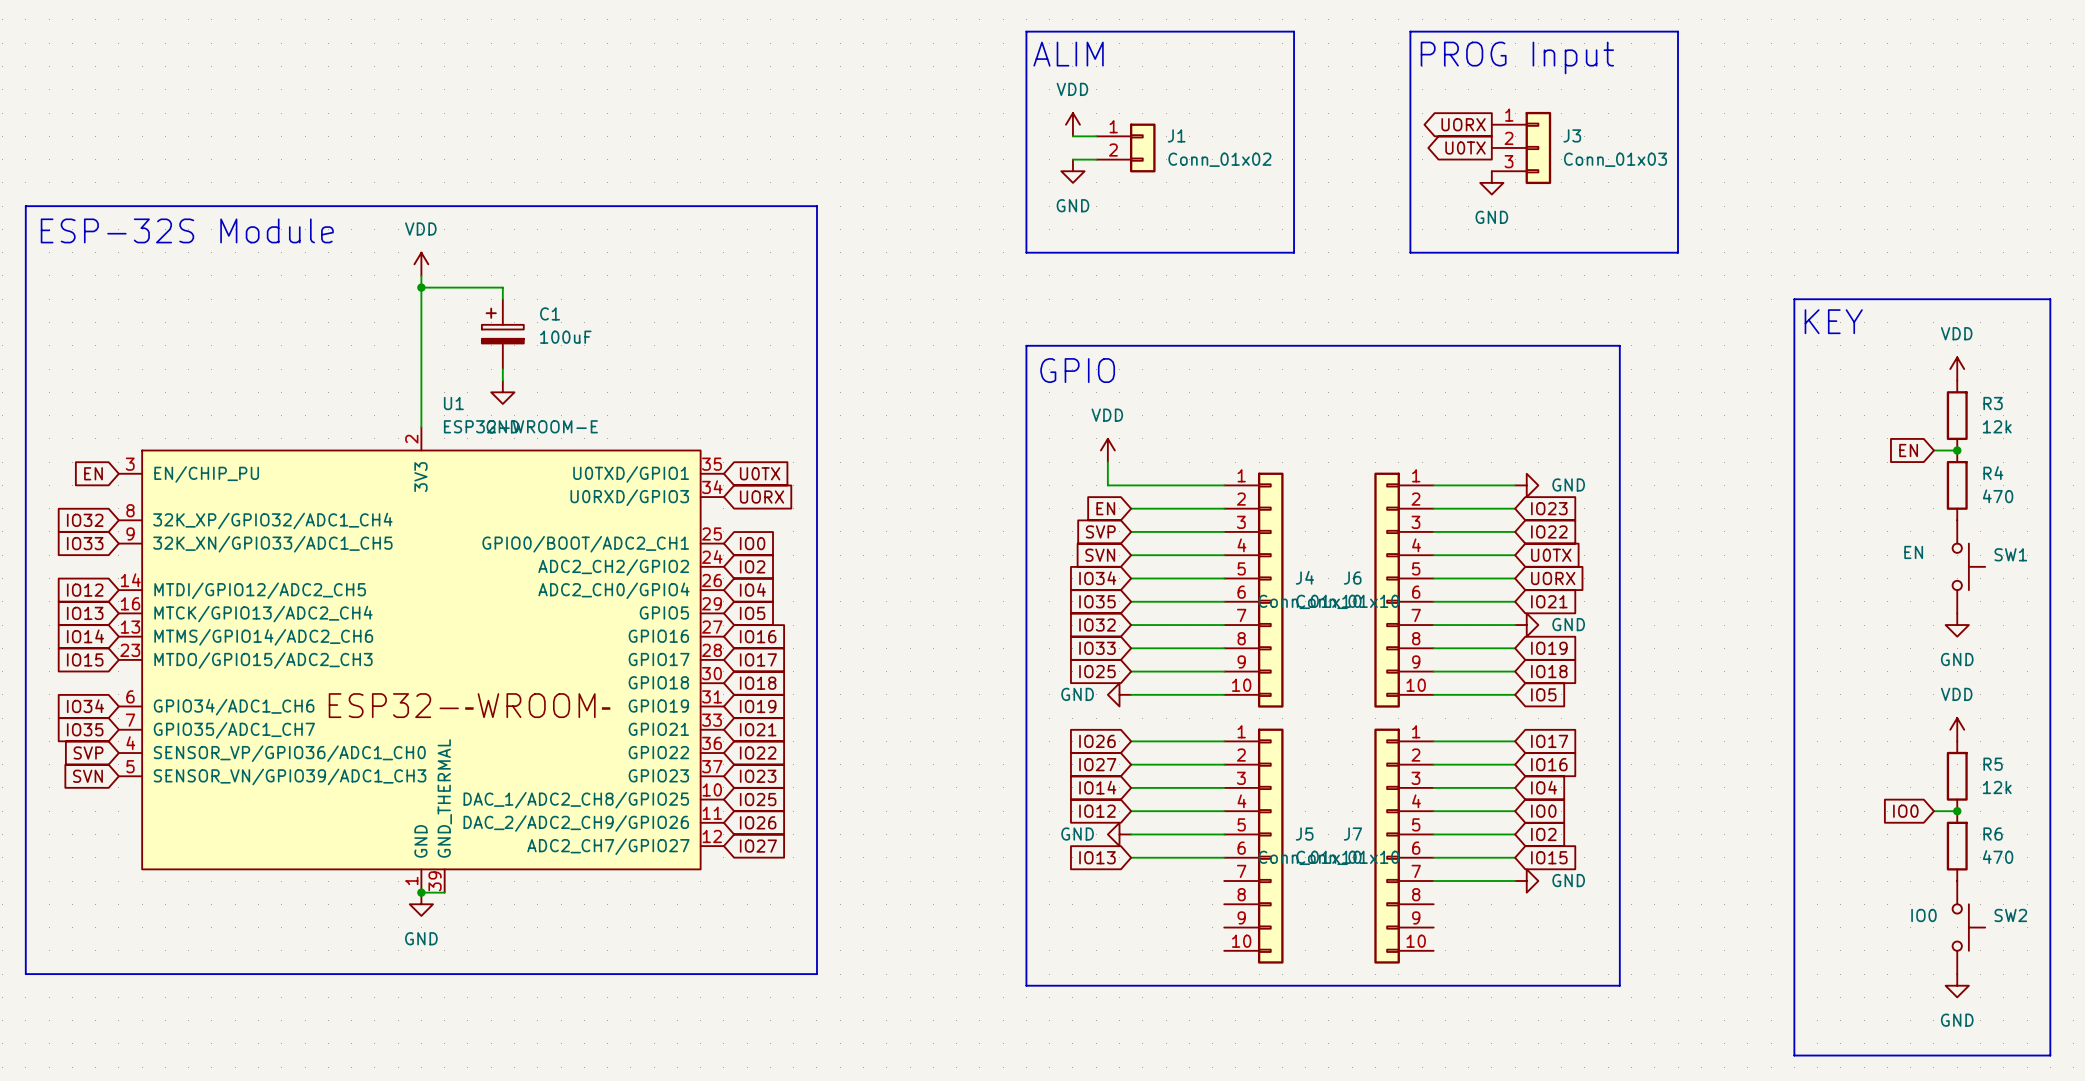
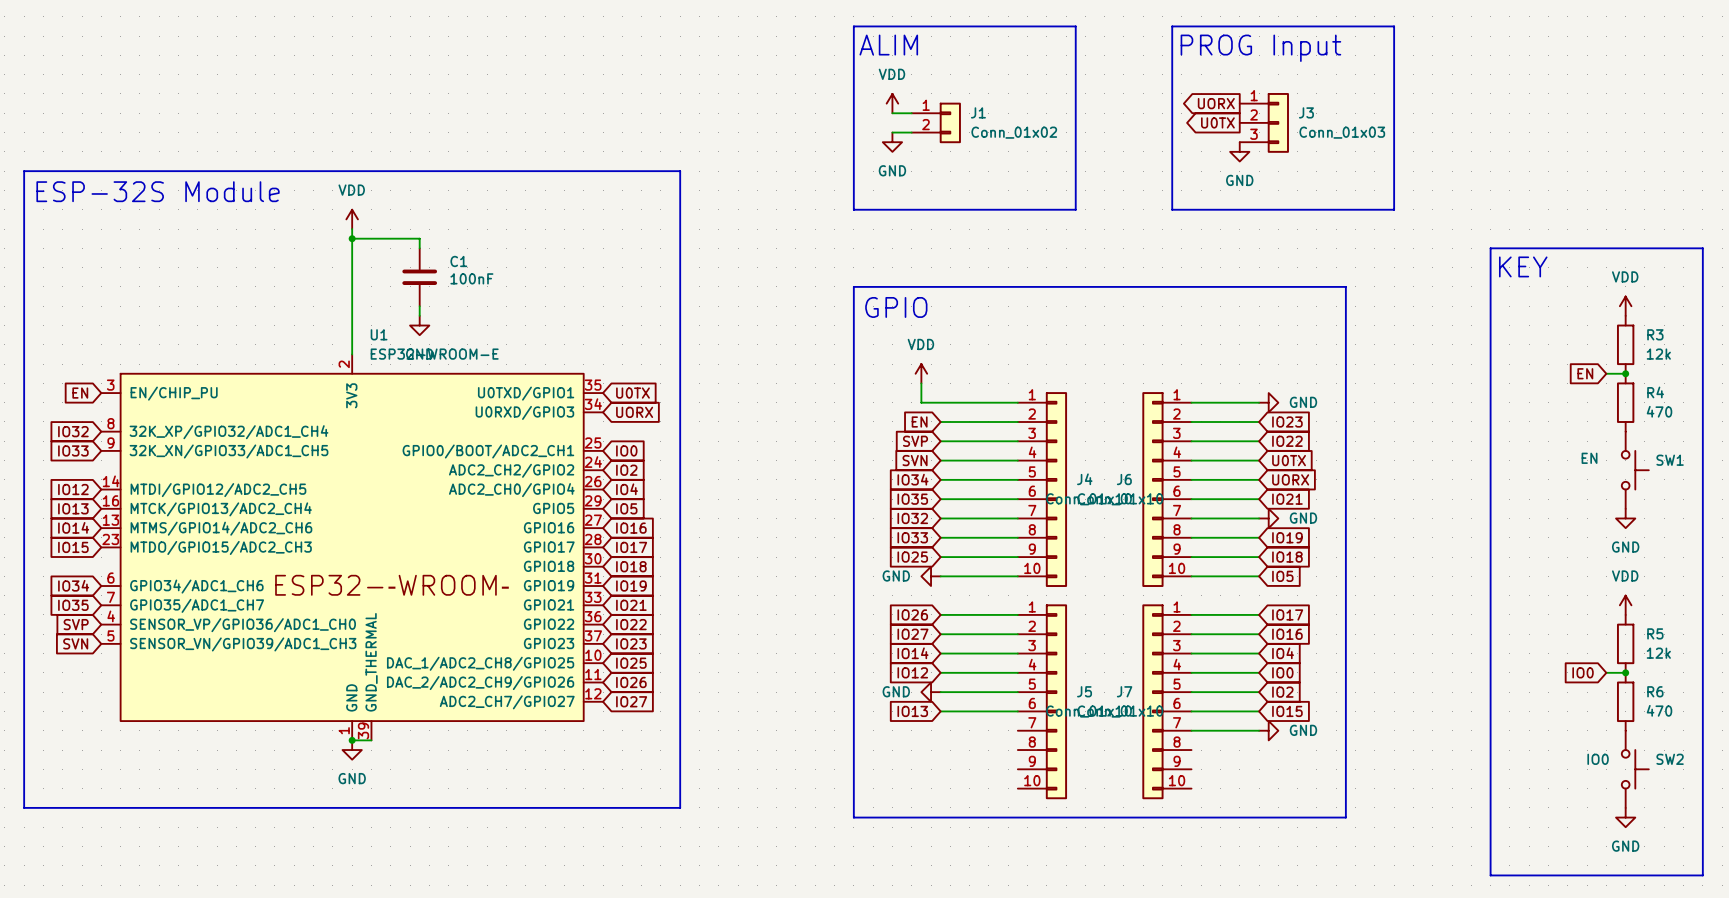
C1 symbol: [481, 299, 524, 370] -> [402, 248, 438, 307]
C1 value: 100uF (565, 337) -> 100nF (471, 278)

